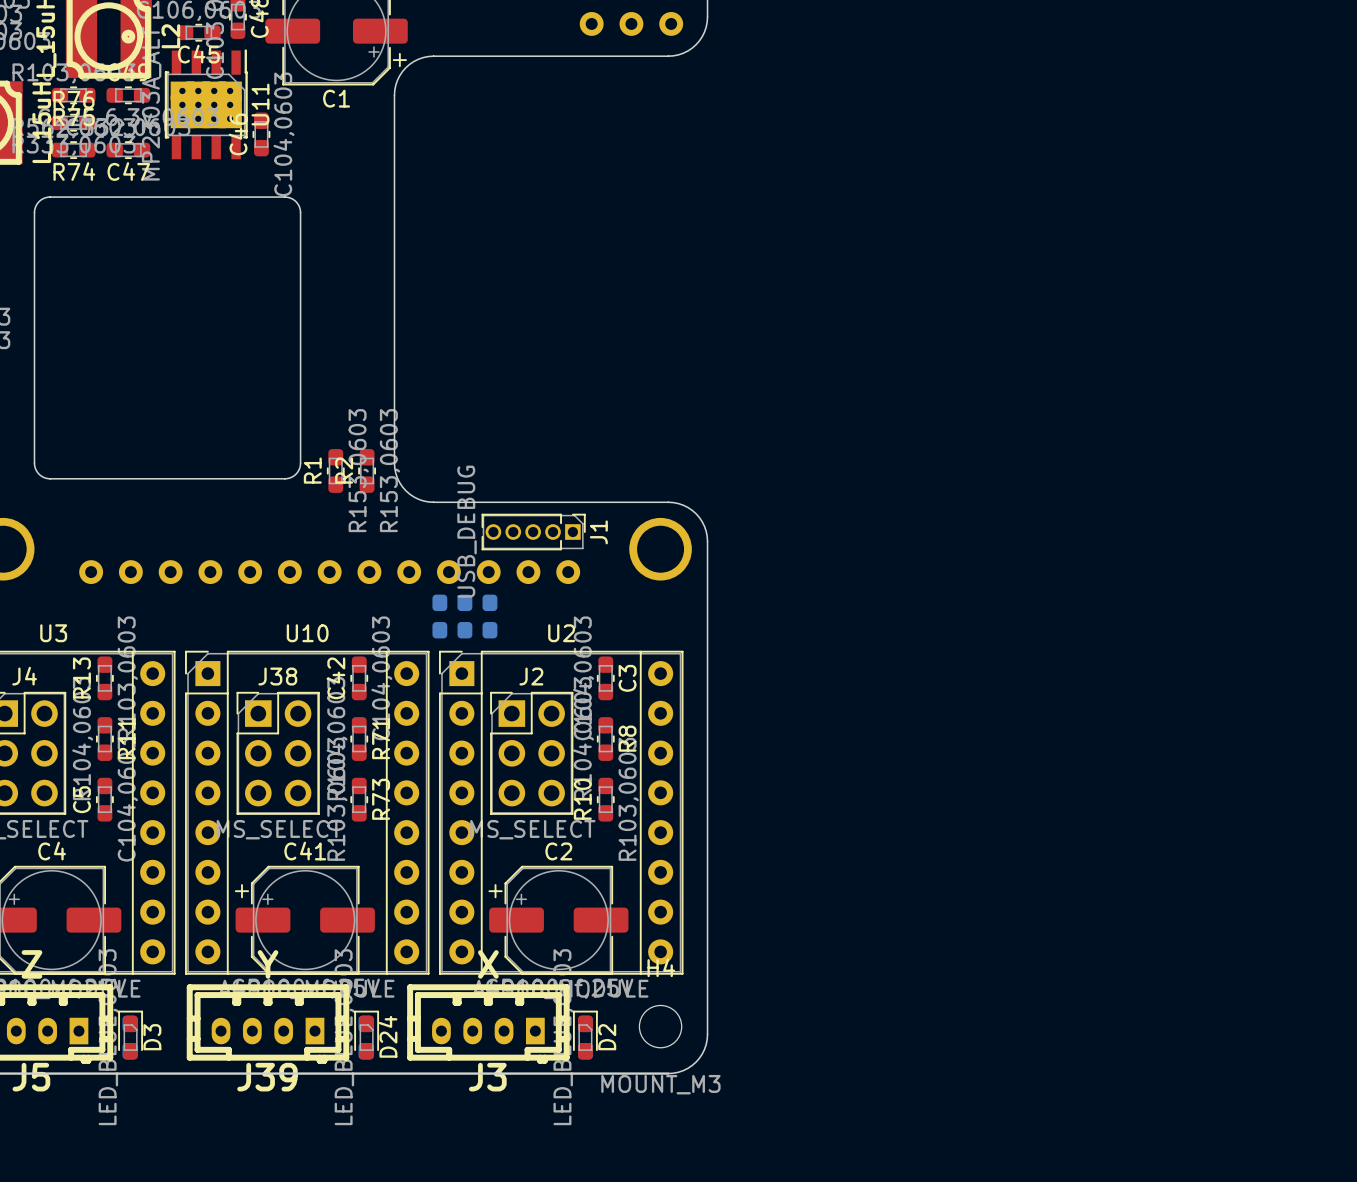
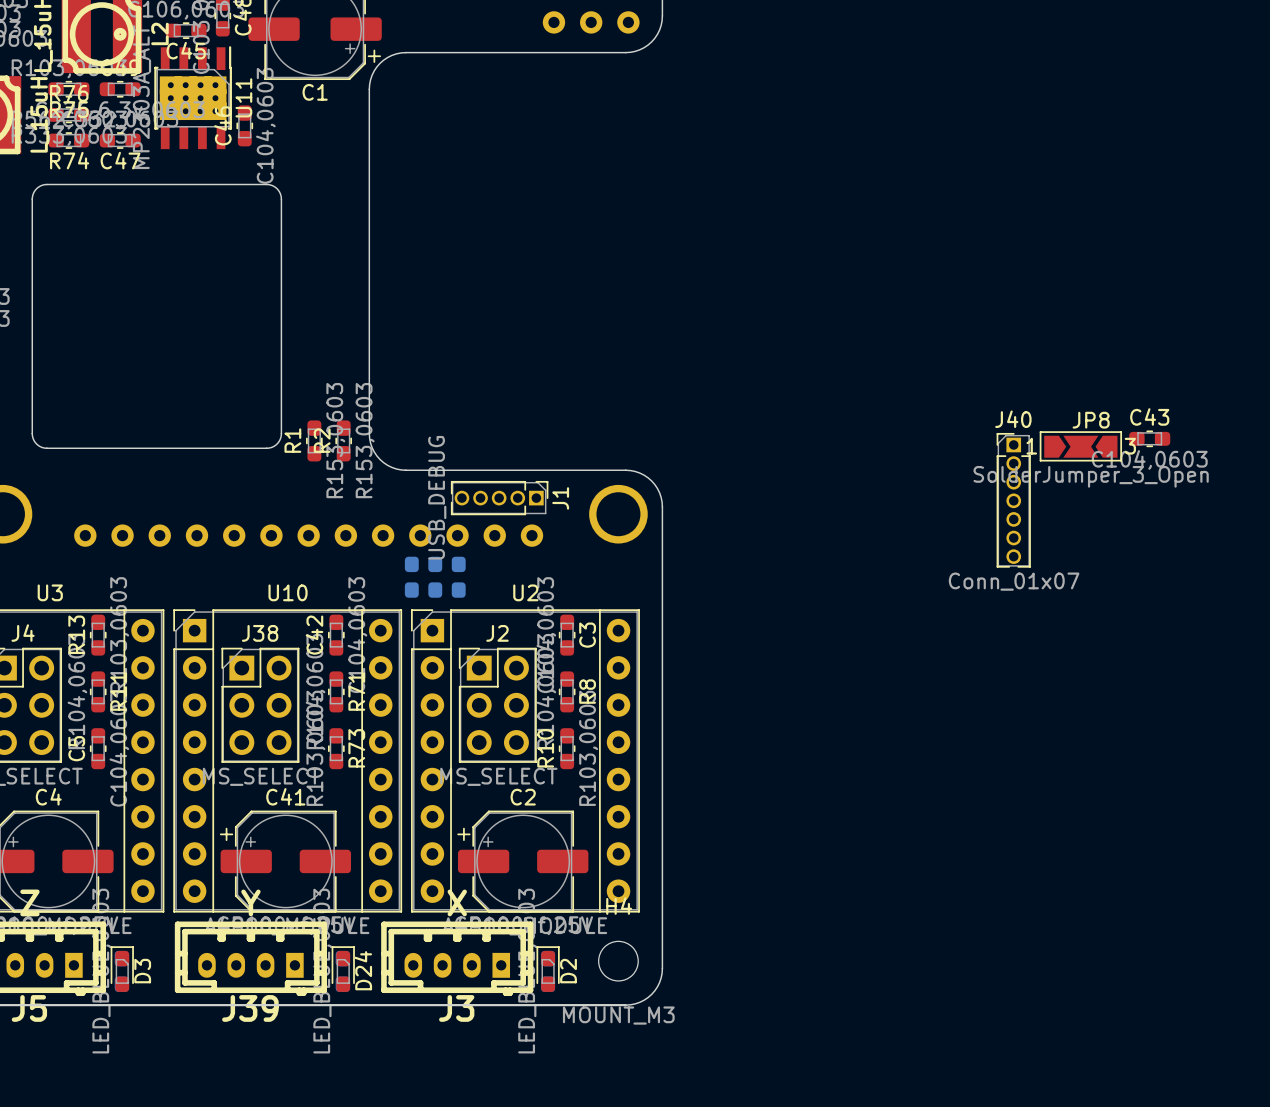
C43: none -> C104,0603 (1149, 438)
JP8: none -> SolderJumper_3_Open (1080, 446)
J40: none -> Conn_01x07 (1013, 500)

